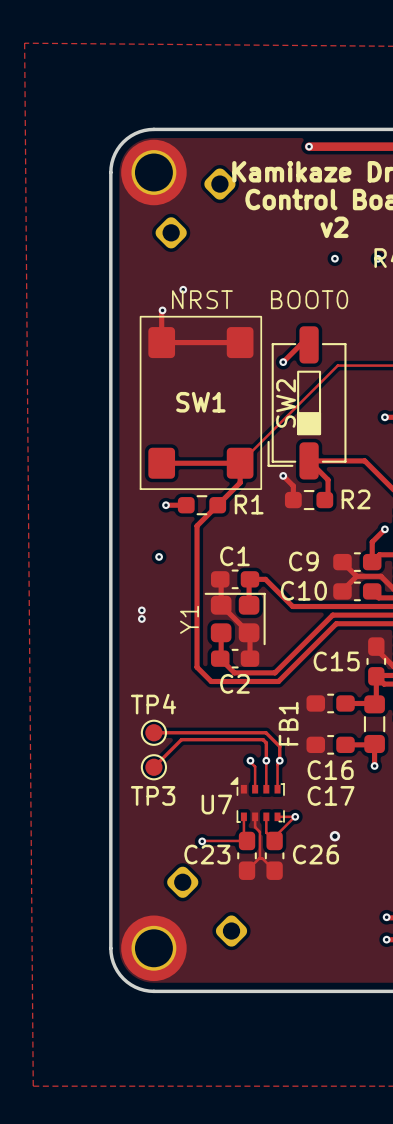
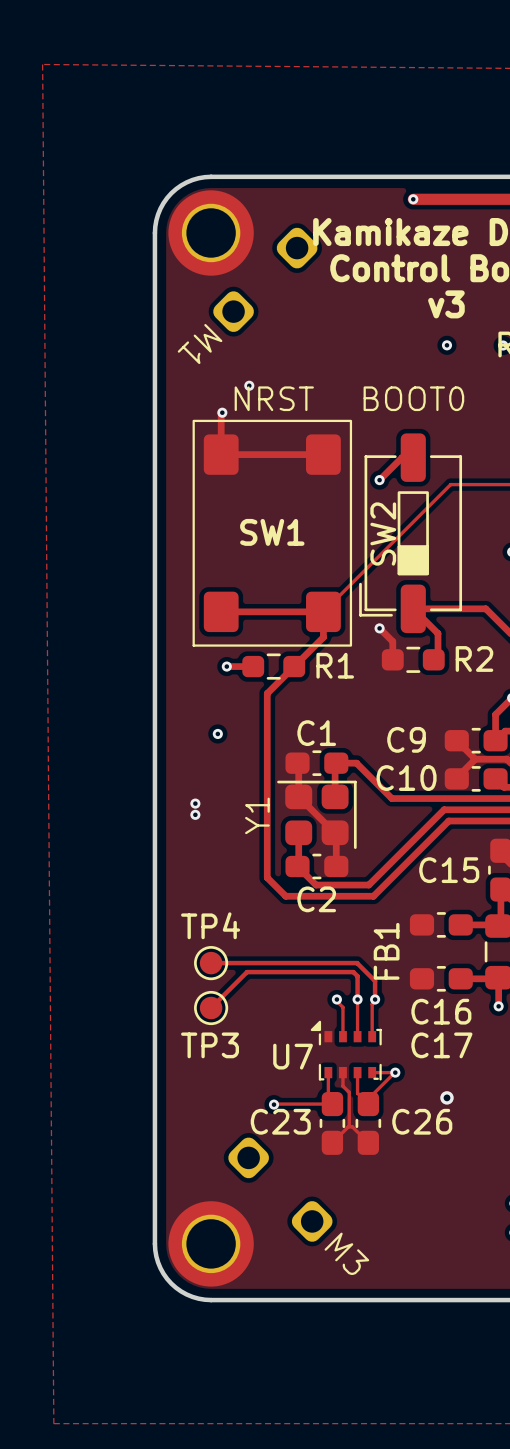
text: v2 (334, 227) -> v3 (446, 304)
text: none -> M1 (200, 344)
text: none -> M3 (346, 1253)

